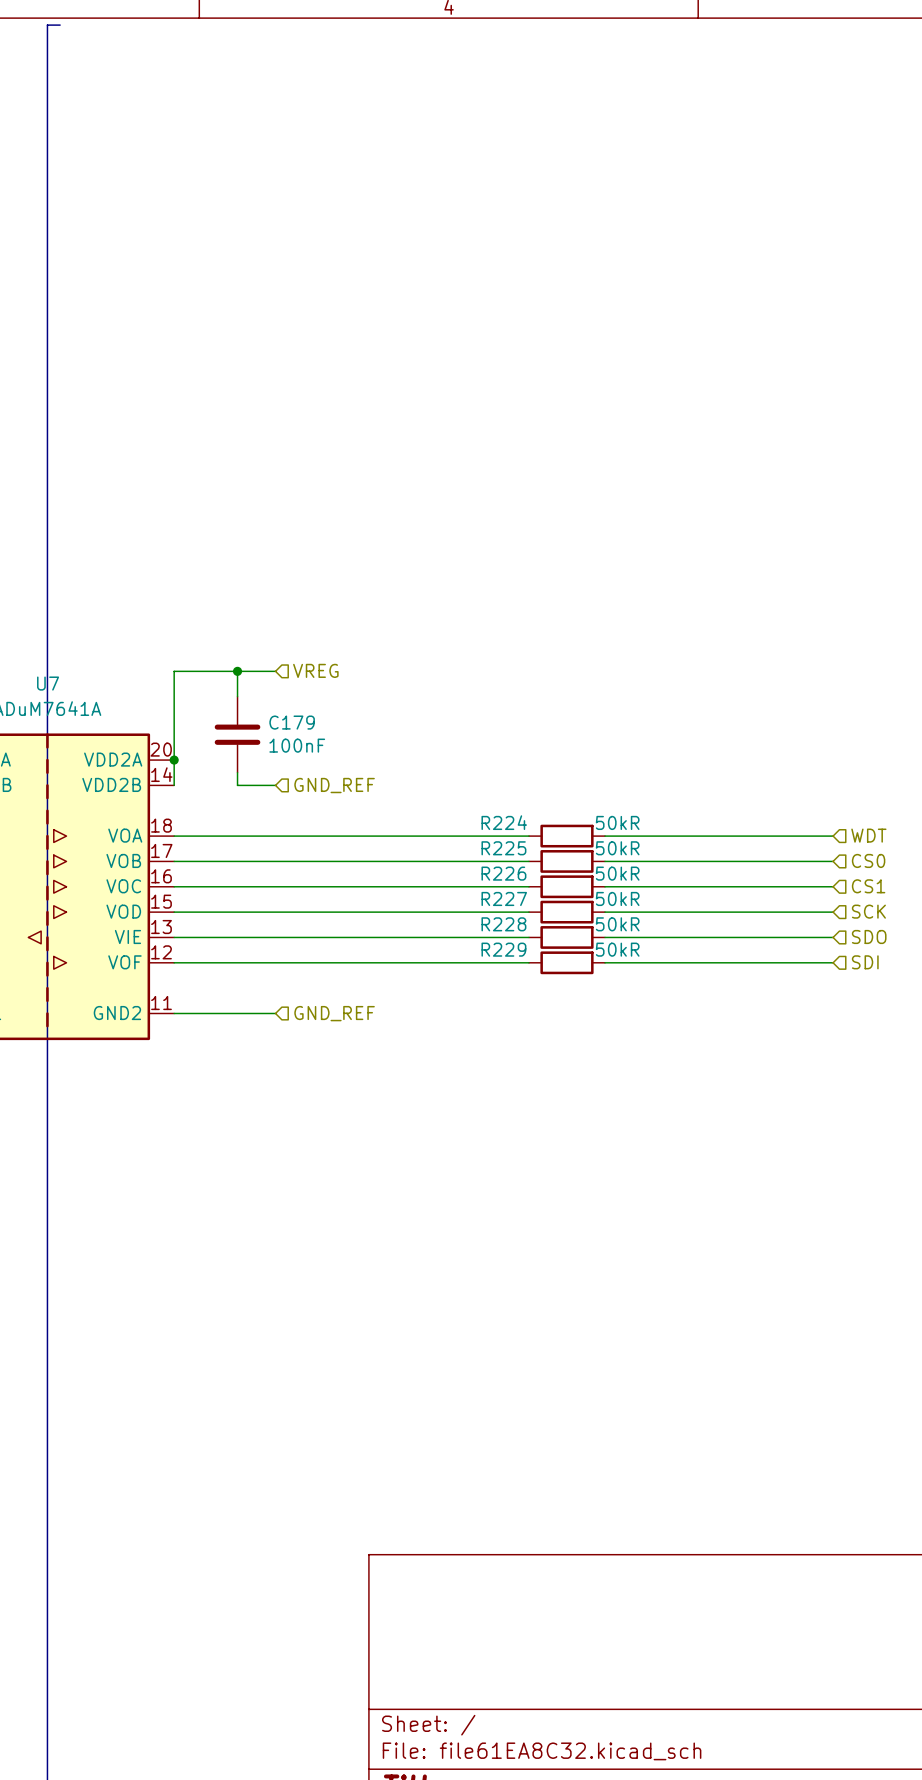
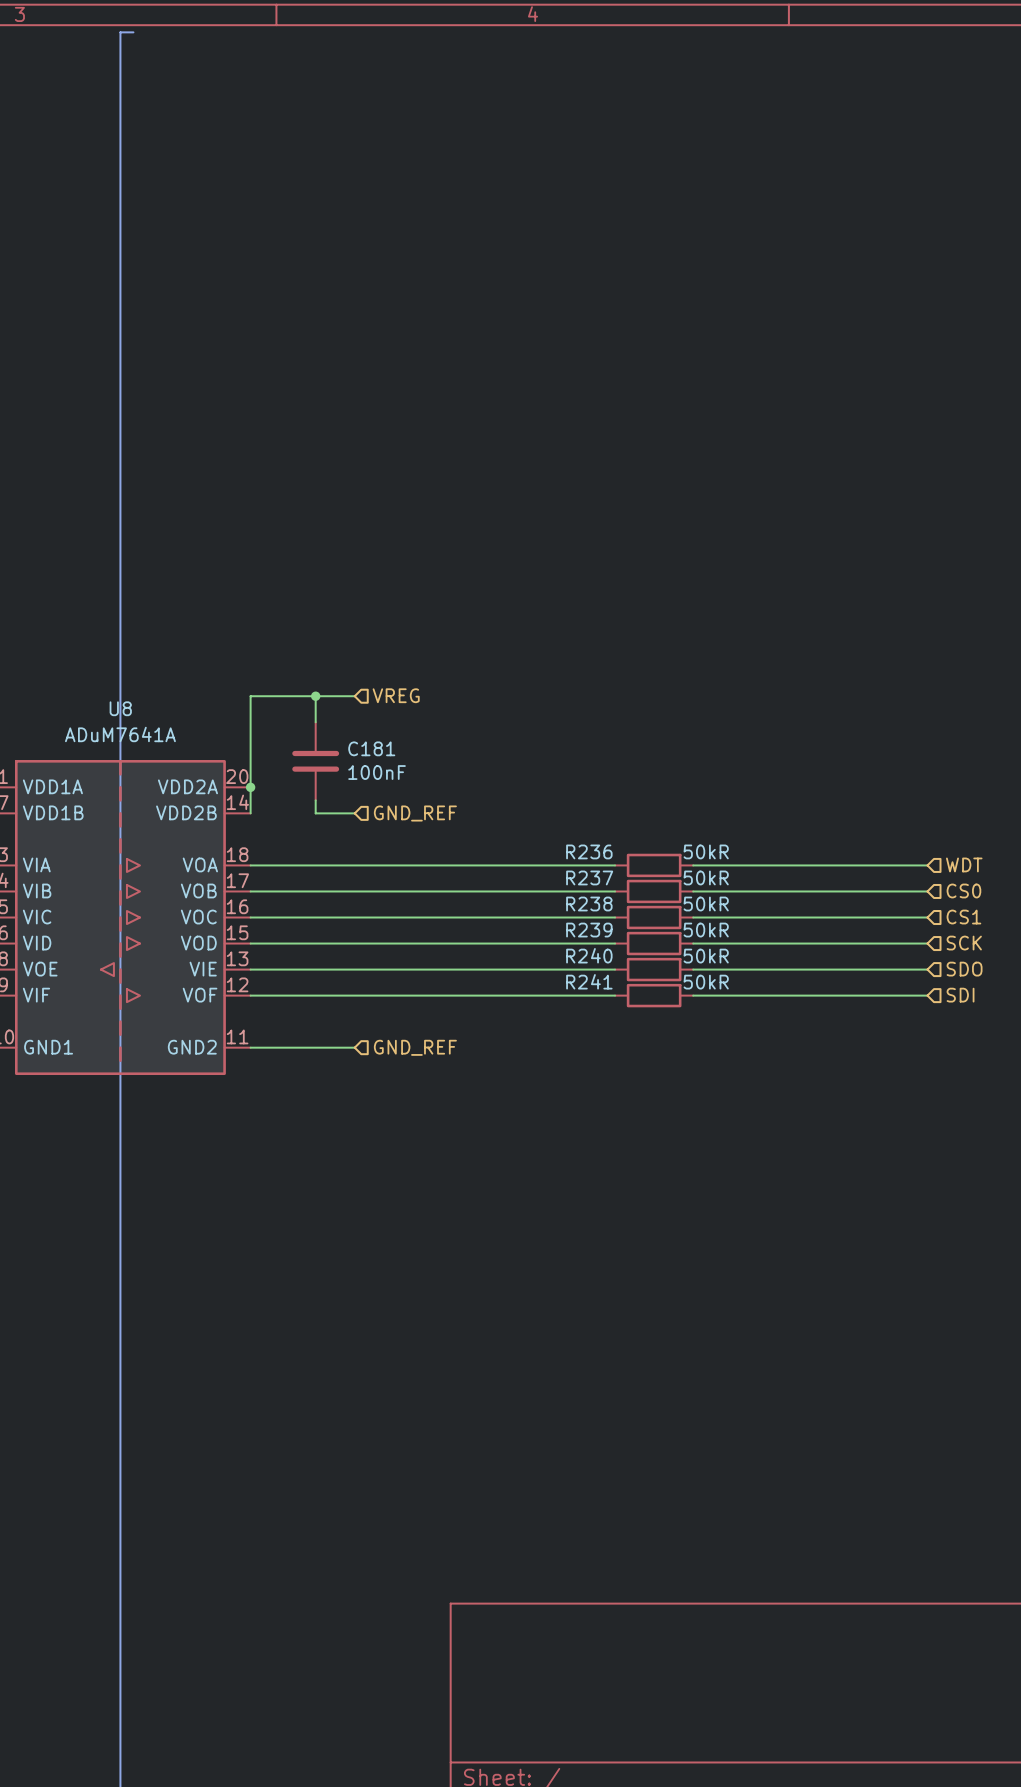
U7 name: U7 (48, 683) -> U8 (120, 708)
C179 name: C179 (292, 722) -> C181 (371, 748)
R224 name: R224 (504, 822) -> R236 (589, 851)
R225 name: R225 (503, 848) -> R237 (589, 877)
R226 name: R226 (503, 873) -> R238 (589, 904)
R227 name: R227 (504, 898) -> R239 (589, 930)
R228 name: R228 (503, 924) -> R240 (589, 955)
R229 name: R229 (503, 949) -> R241 (589, 981)

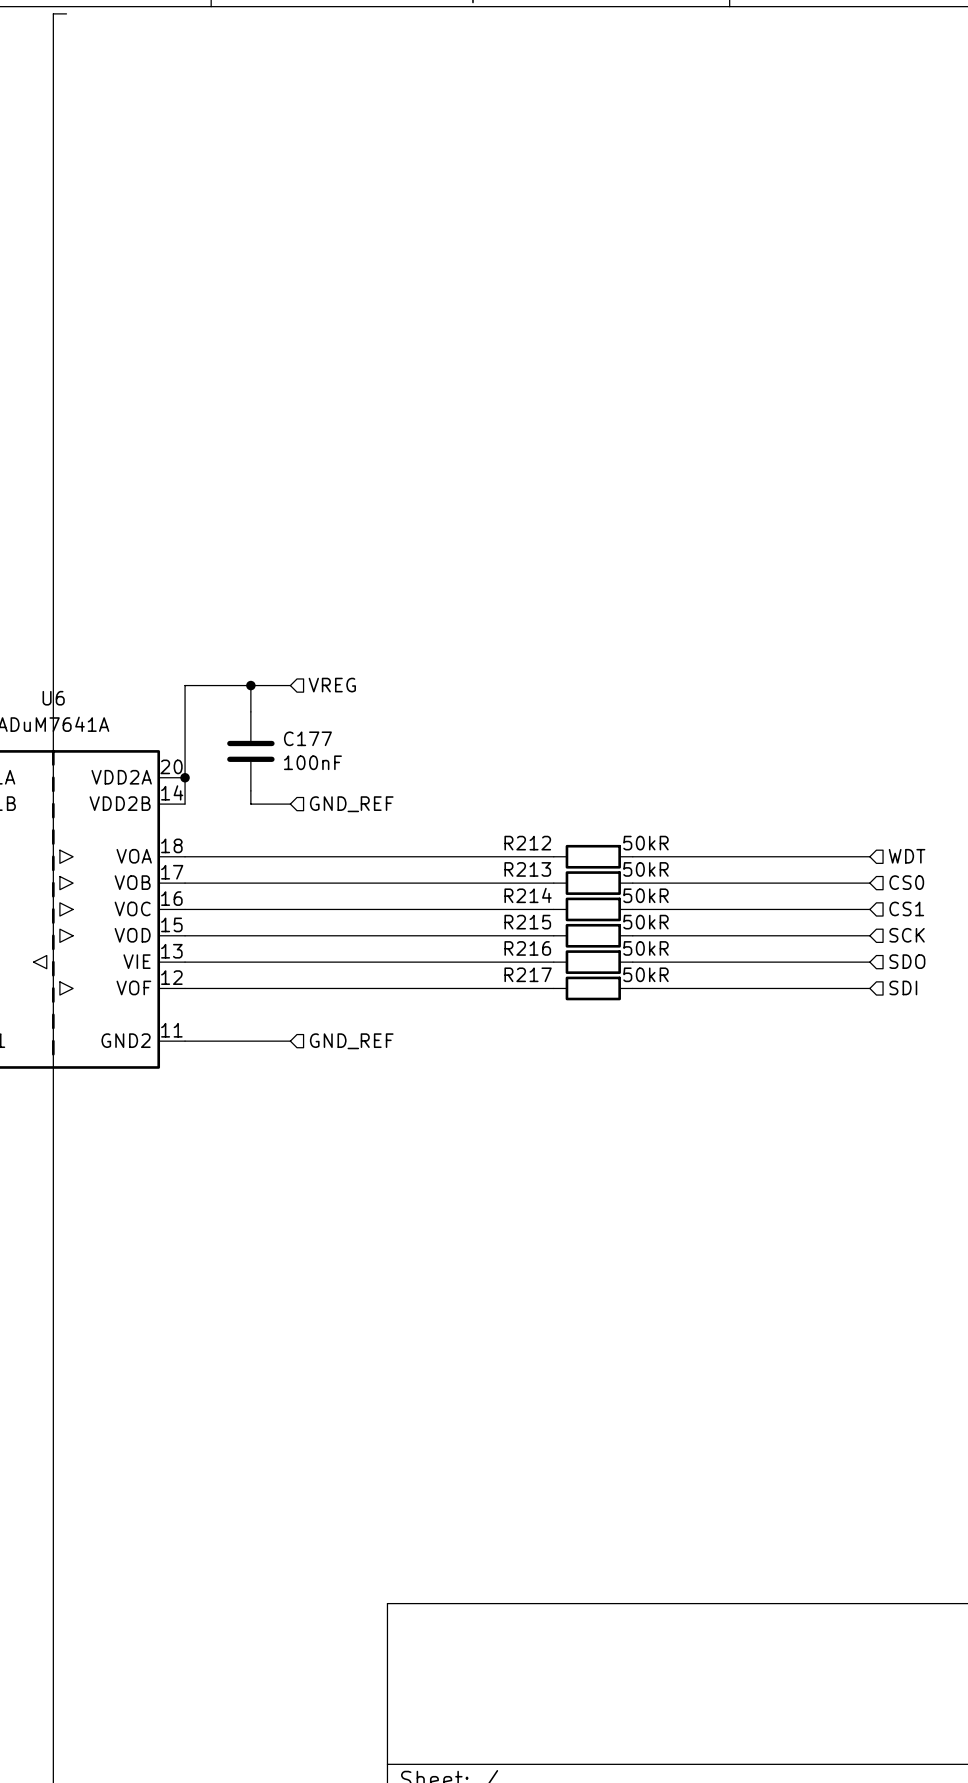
U8 name: U8 (120, 708) -> U6 (53, 698)
C181 name: C181 (371, 748) -> C177 (307, 738)
R236 name: R236 (589, 851) -> R212 (527, 843)
R237 name: R237 (589, 877) -> R213 (527, 869)
R238 name: R238 (589, 904) -> R214 (528, 895)
R239 name: R239 (589, 930) -> R215 (527, 922)
R240 name: R240 (589, 955) -> R216 (527, 948)
R241 name: R241 (589, 981) -> R217 (528, 974)

